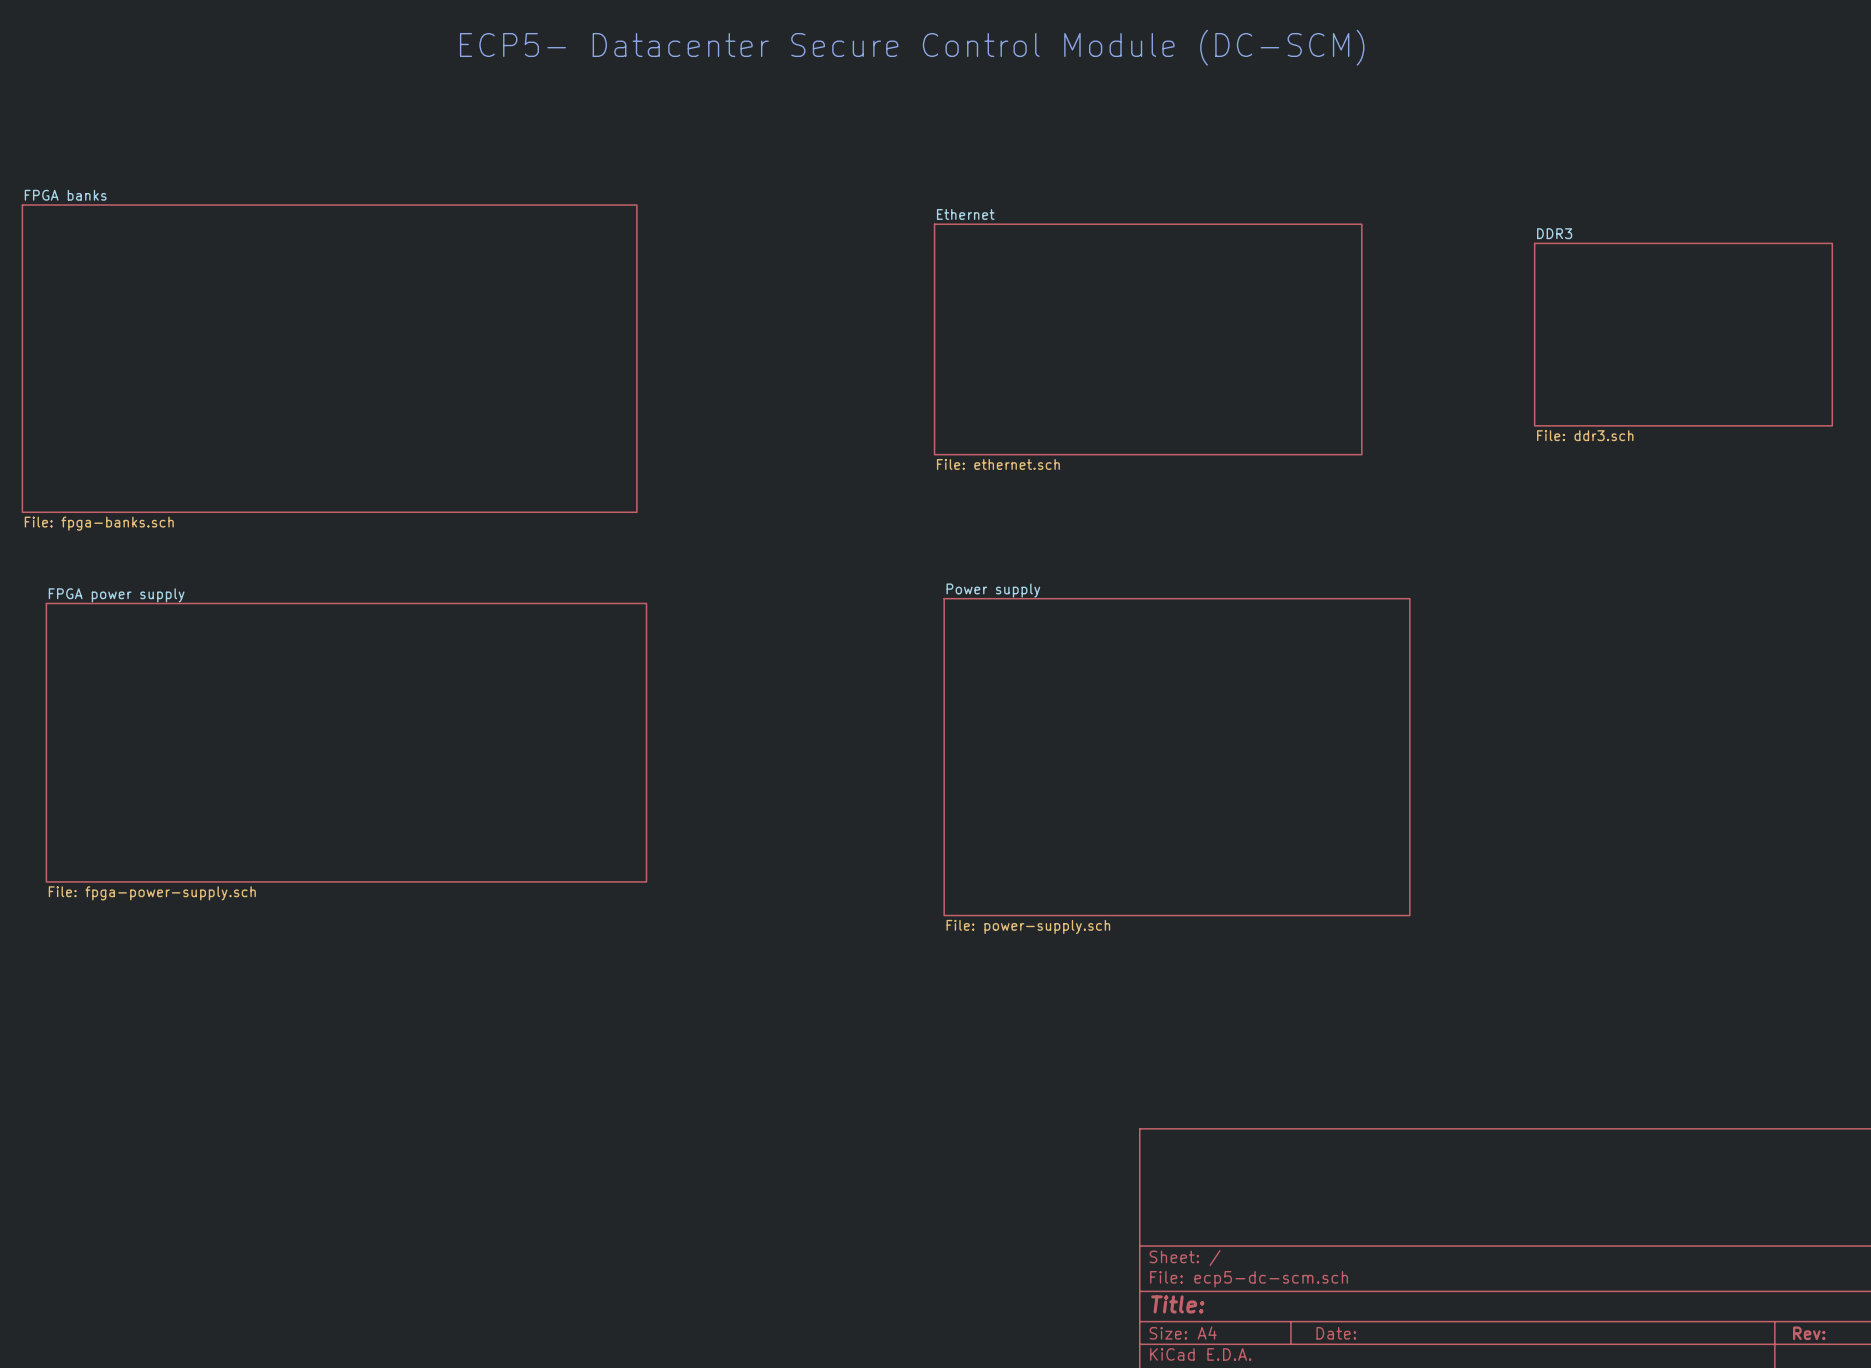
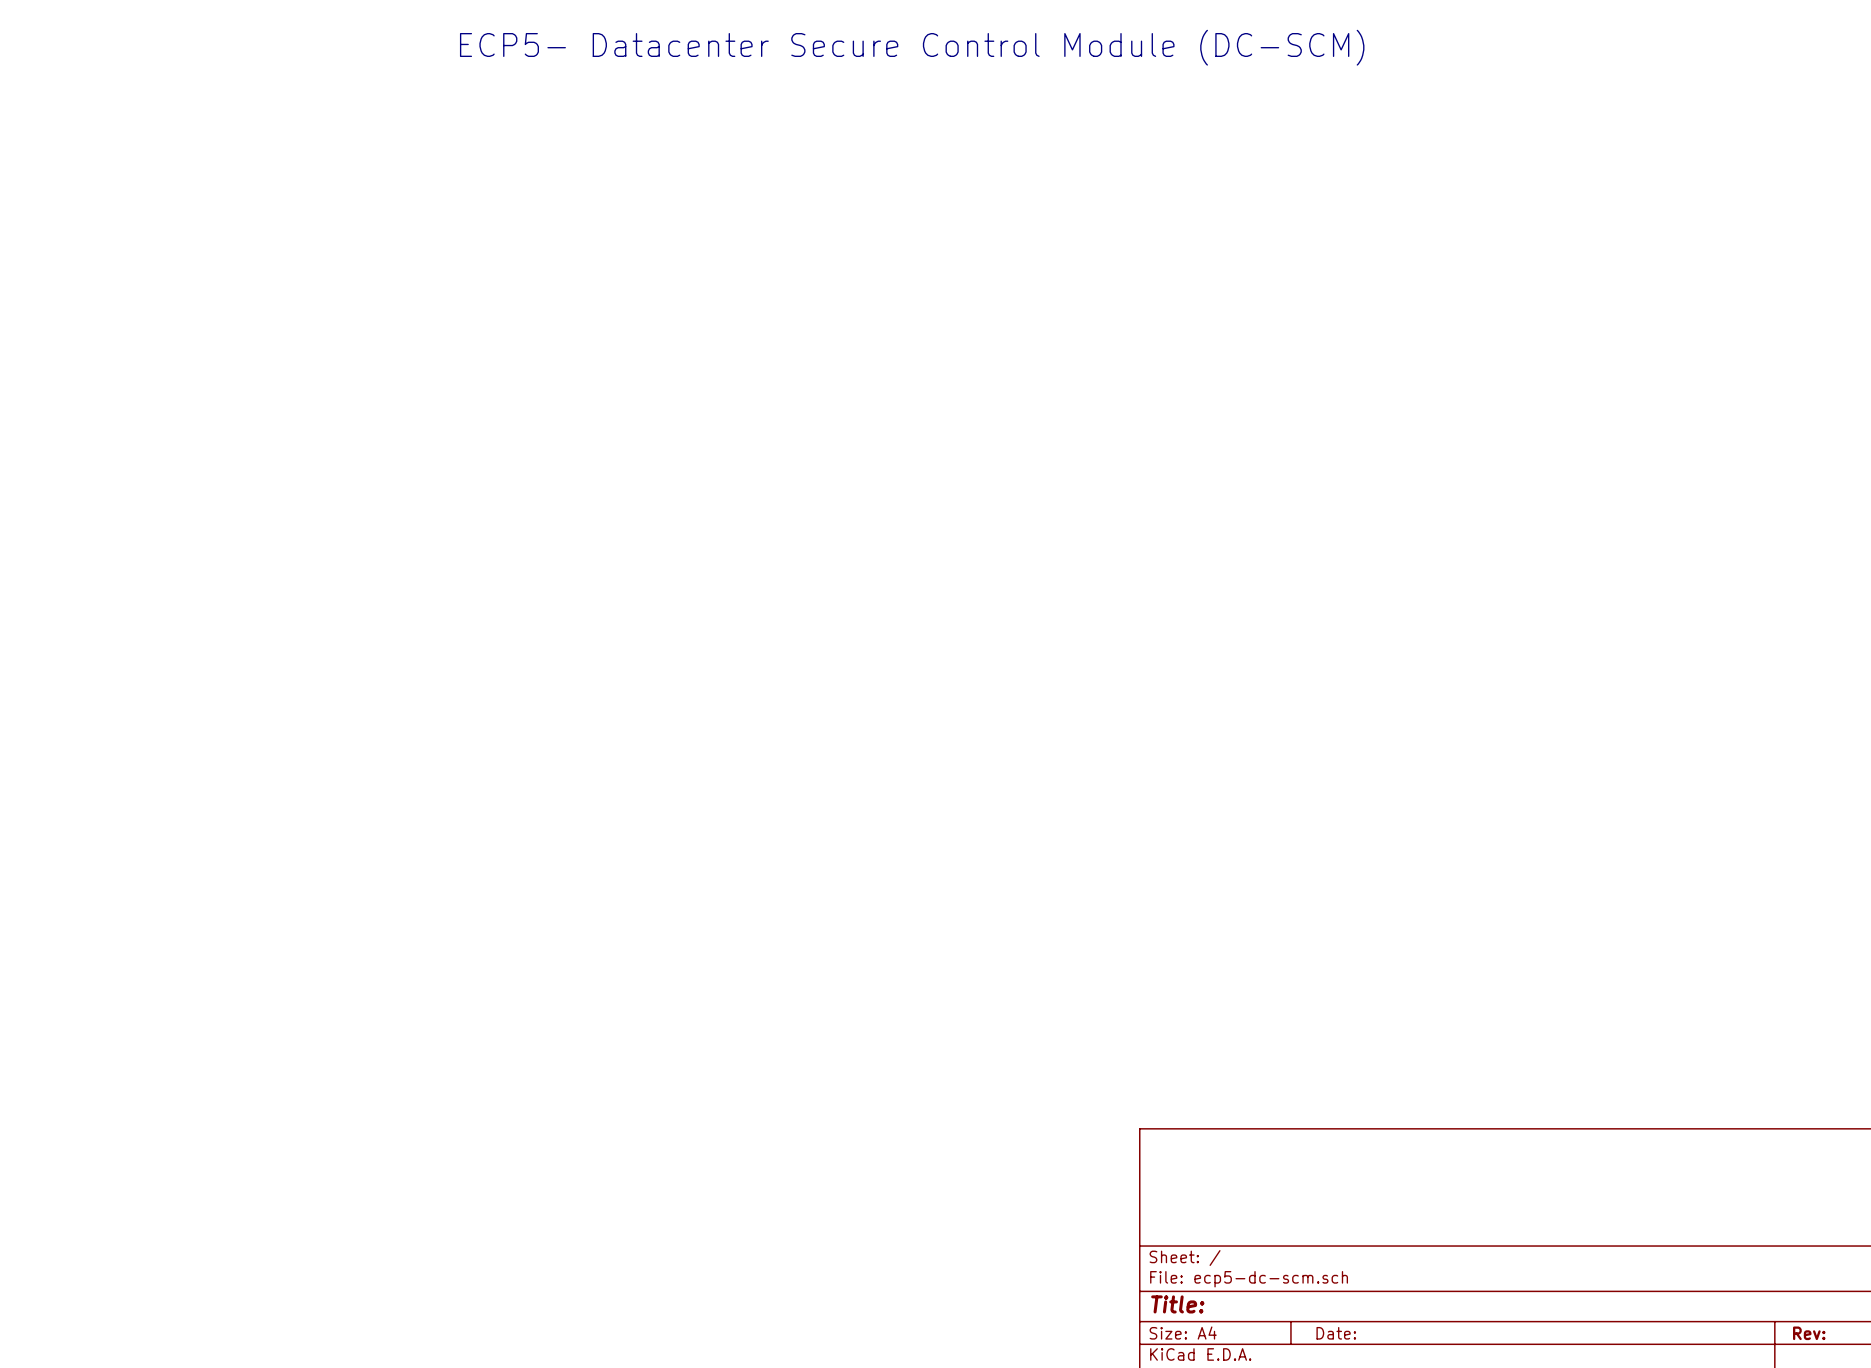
sheet DDR3: File: ddr3.sch (1683, 334) -> none
sheet Ethernet: File: ethernet.sch (1148, 339) -> none
sheet FPGA banks: File: fpga-banks.sch (329, 358) -> none
sheet FPGA power supply: File: fpga-power-supply.sch (346, 742) -> none
sheet Power supply: File: power-supply.sch (1176, 757) -> none

